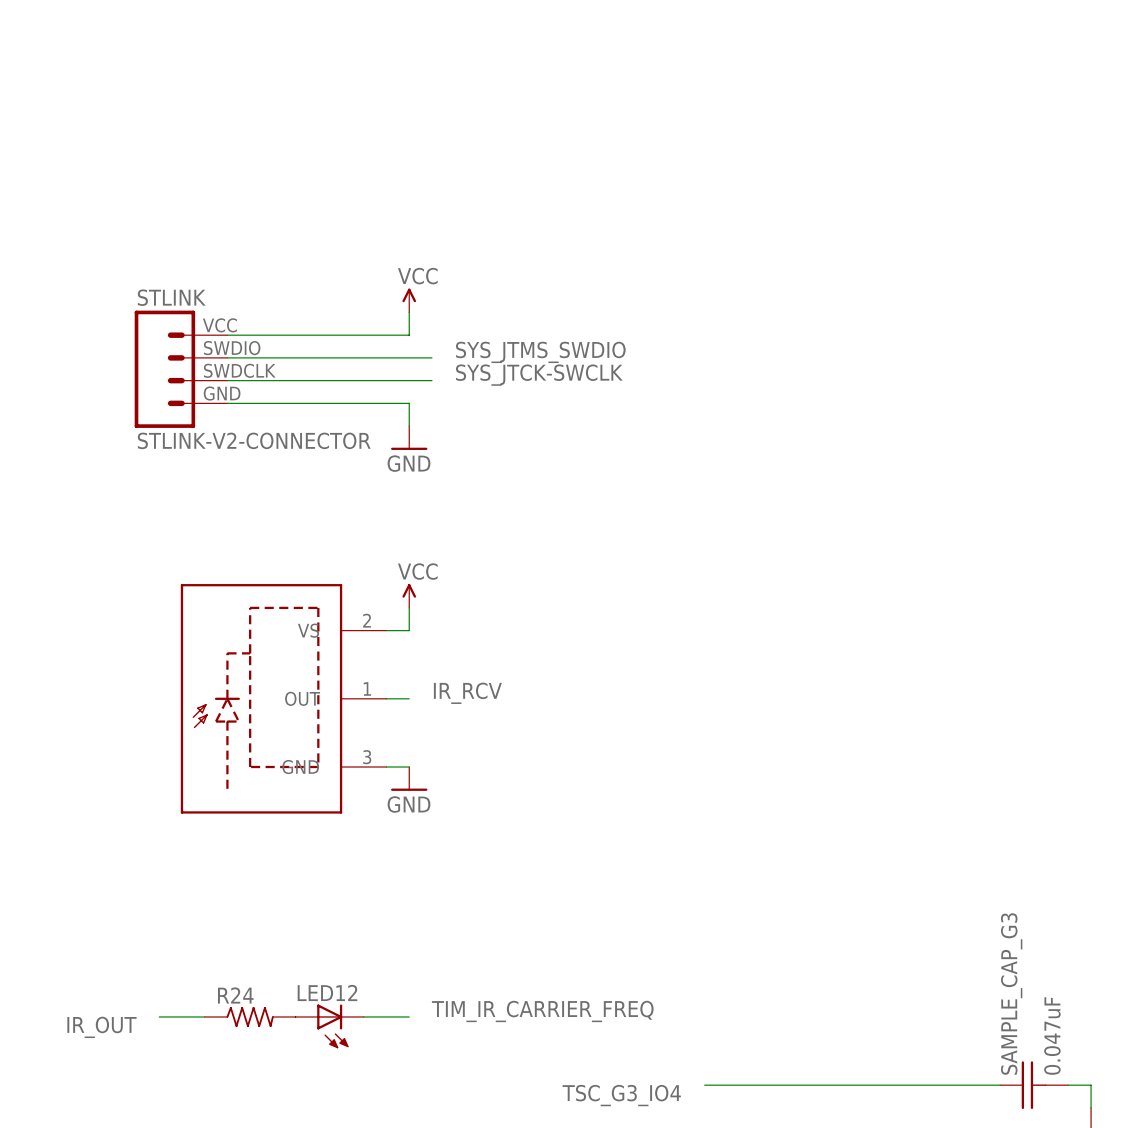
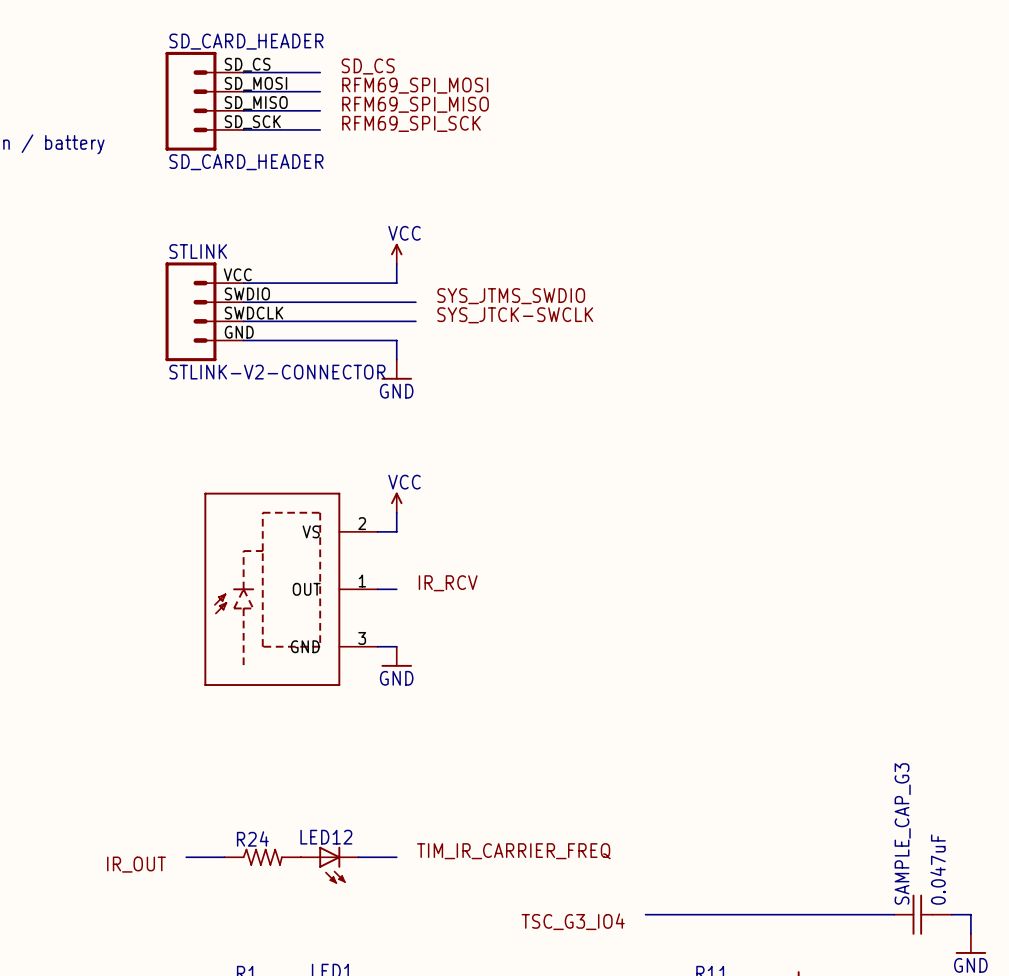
label: none -> SD_CS (368, 66)
wire: none -> (243, 72) (320, 72)
label: none -> RFM69_SPI_MOSI (415, 85)
wire: none -> (243, 91) (320, 91)
SD_CARD_HEADER: none -> SD_CARD_HEADER (204, 101)
label: none -> RFM69_SPI_MISO (415, 104)
wire: none -> (243, 110) (320, 110)
label: none -> RFM69_SPI_SCK (411, 123)
wire: none -> (243, 129) (320, 129)

